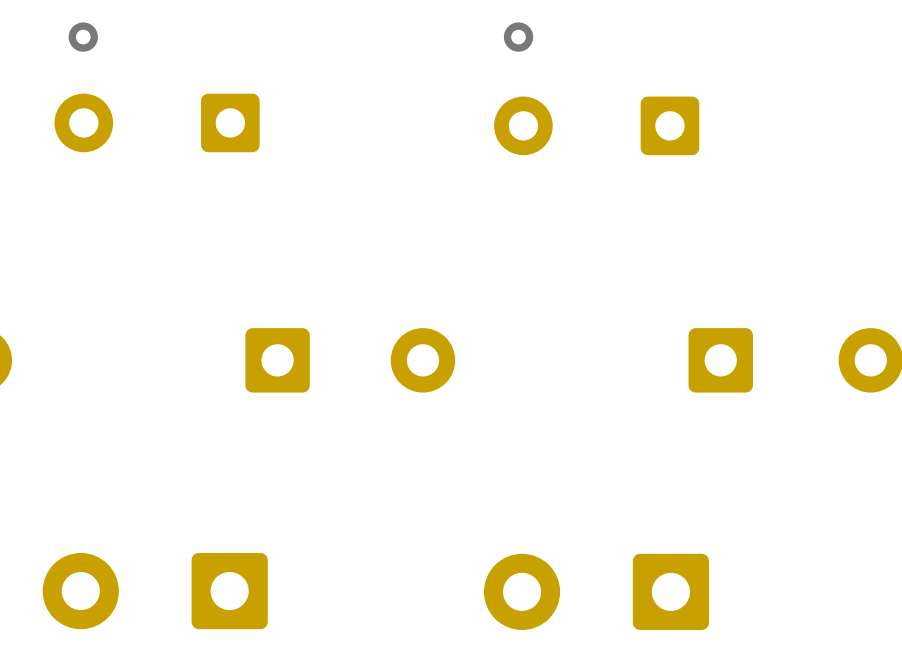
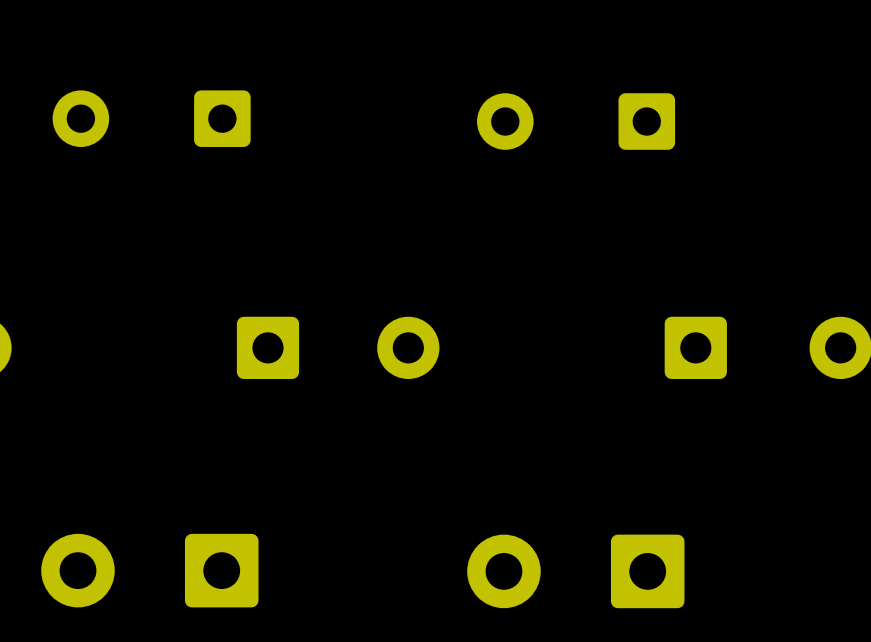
via: (83, 37) -> none
via: (518, 37) -> none

